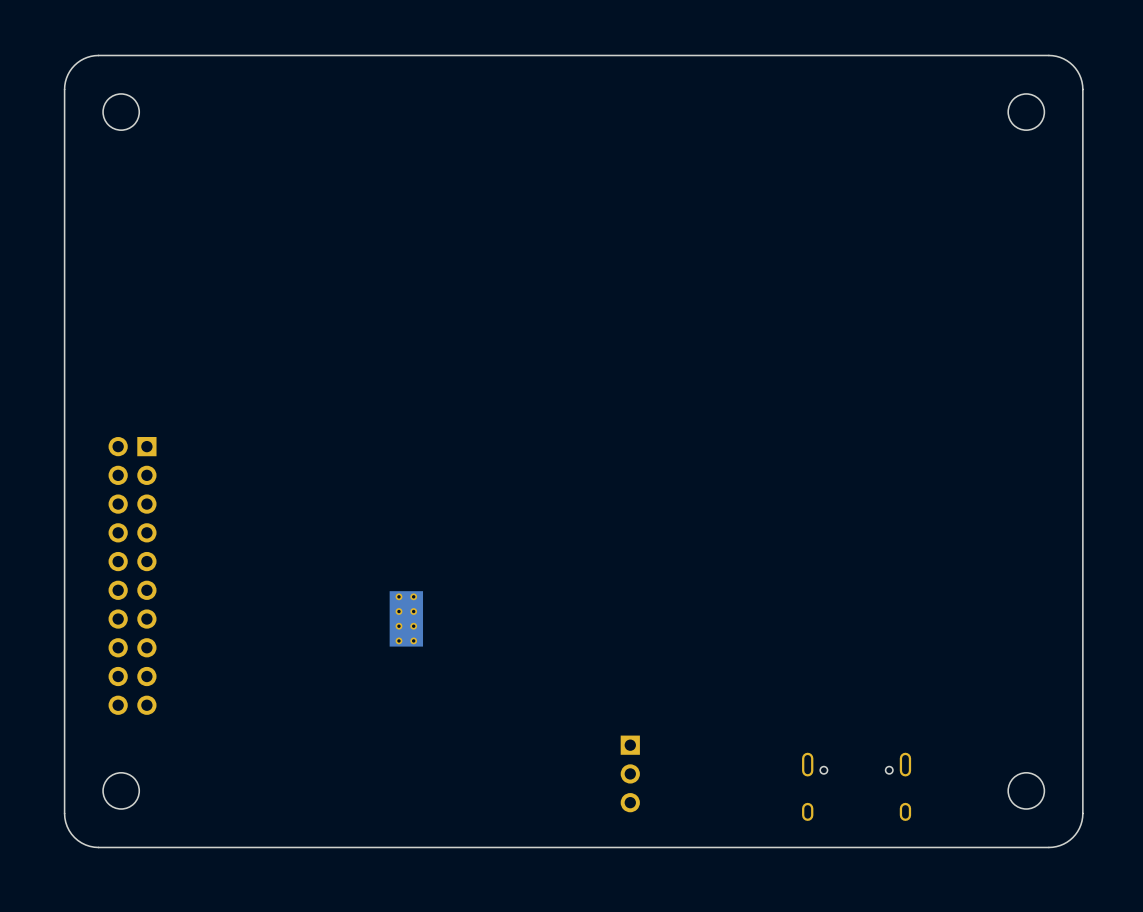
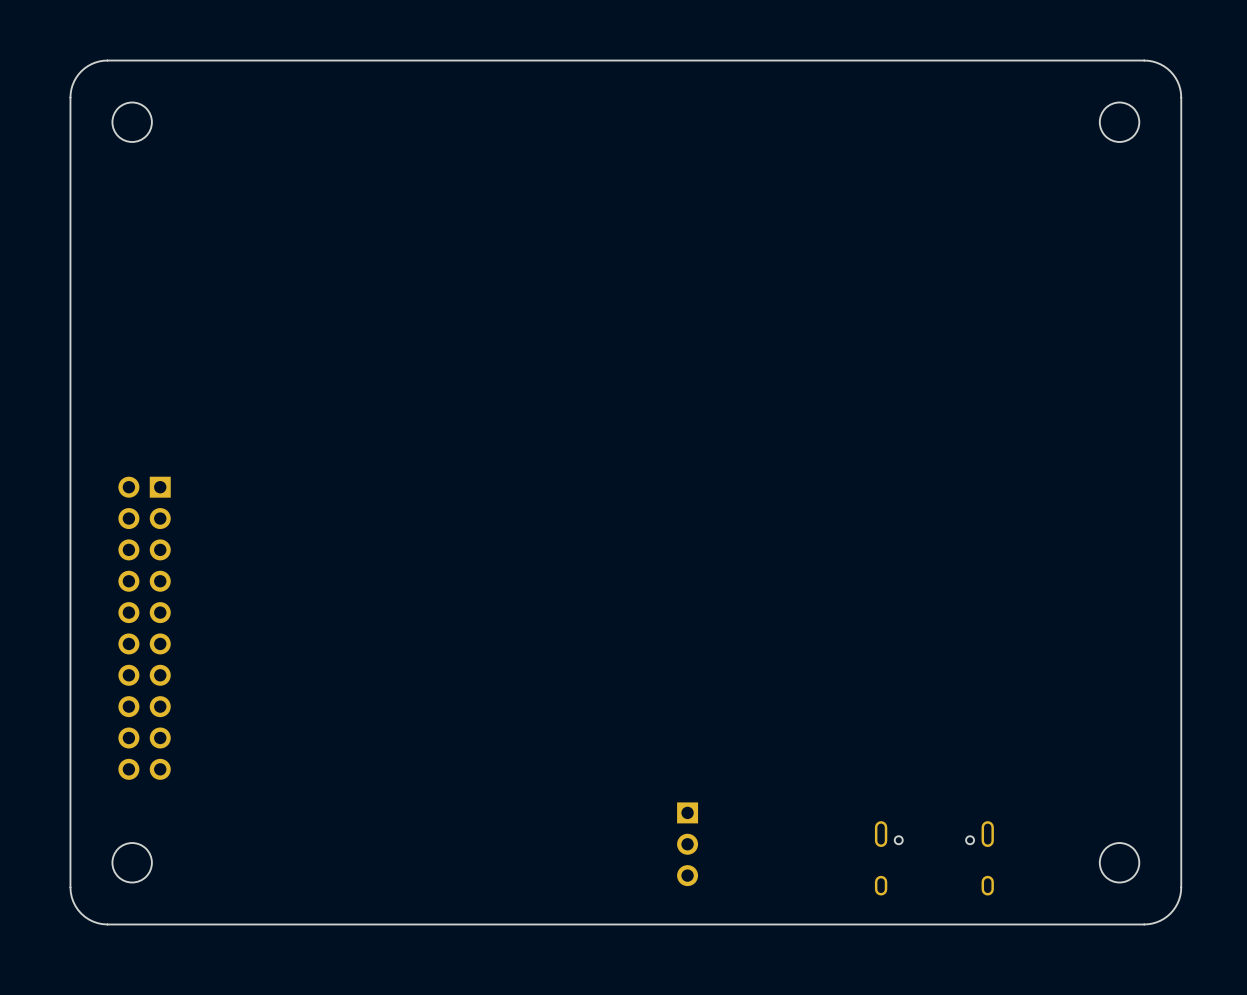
part: (406, 618) -> none

